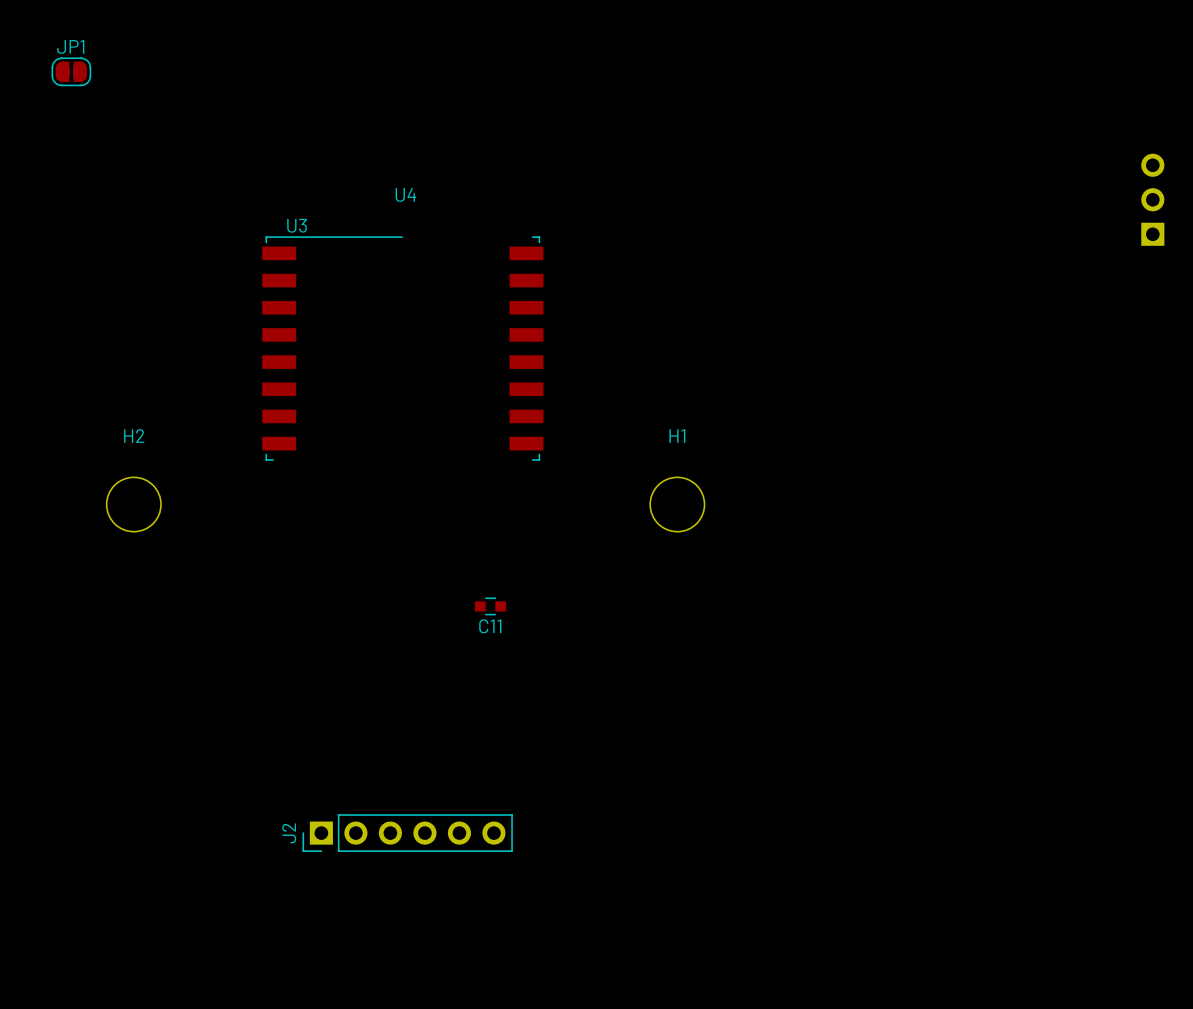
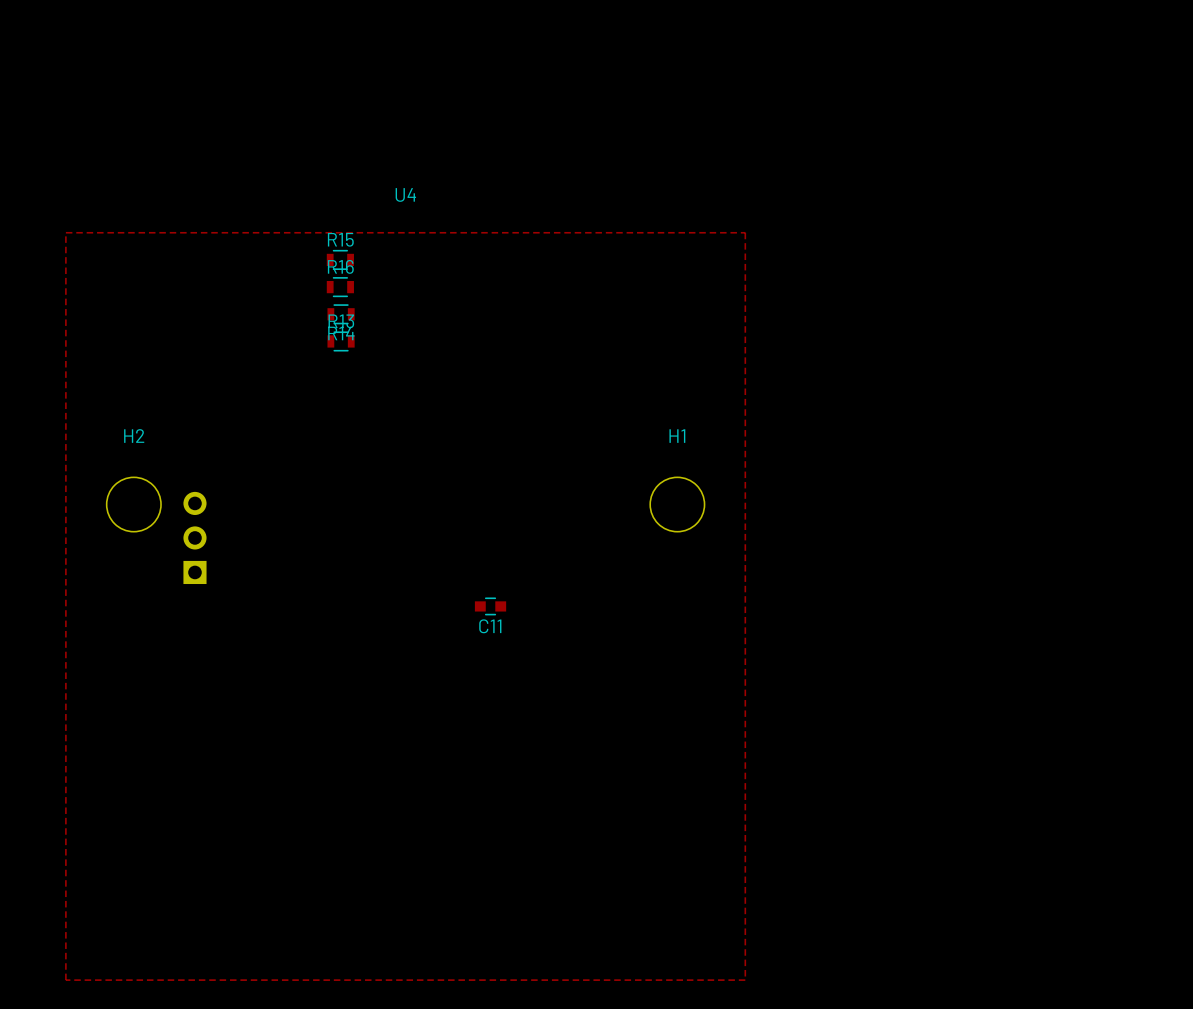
JP1: (71, 71) -> none
part: (1152, 199) -> none
top zone outline: none -> (65, 232) (65, 980) (745, 980) (745, 232) (65, 232)
R15: none -> (340, 259)
R16: none -> (340, 287)
R14: none -> (341, 314)
R13: none -> (341, 341)
U3: (402, 348) -> none
part: none -> (194, 537)
J2: (407, 833) -> none

